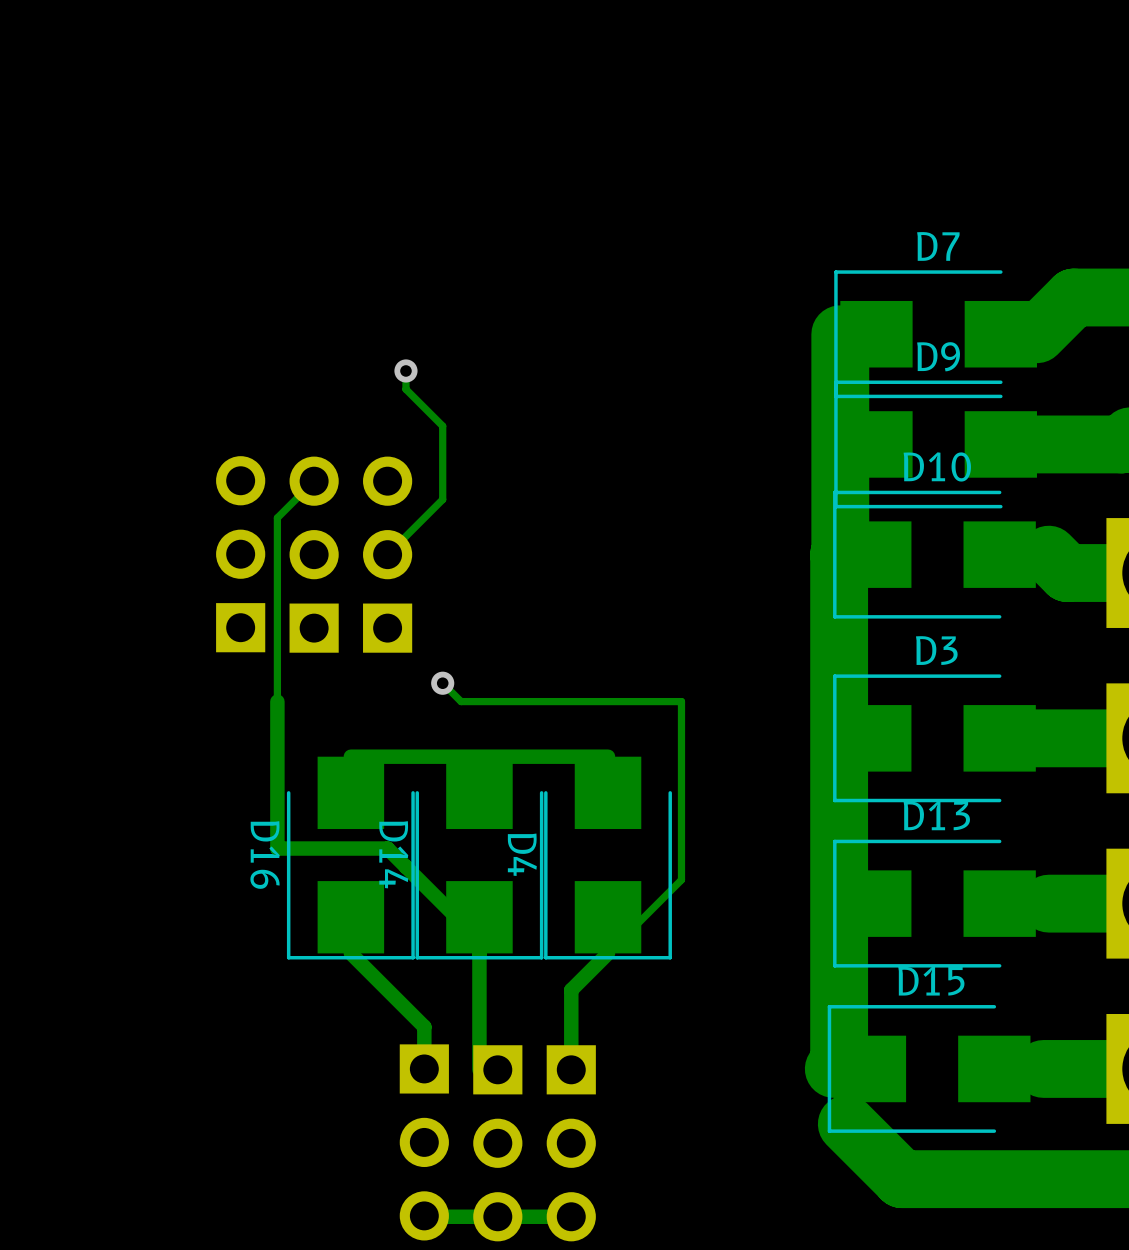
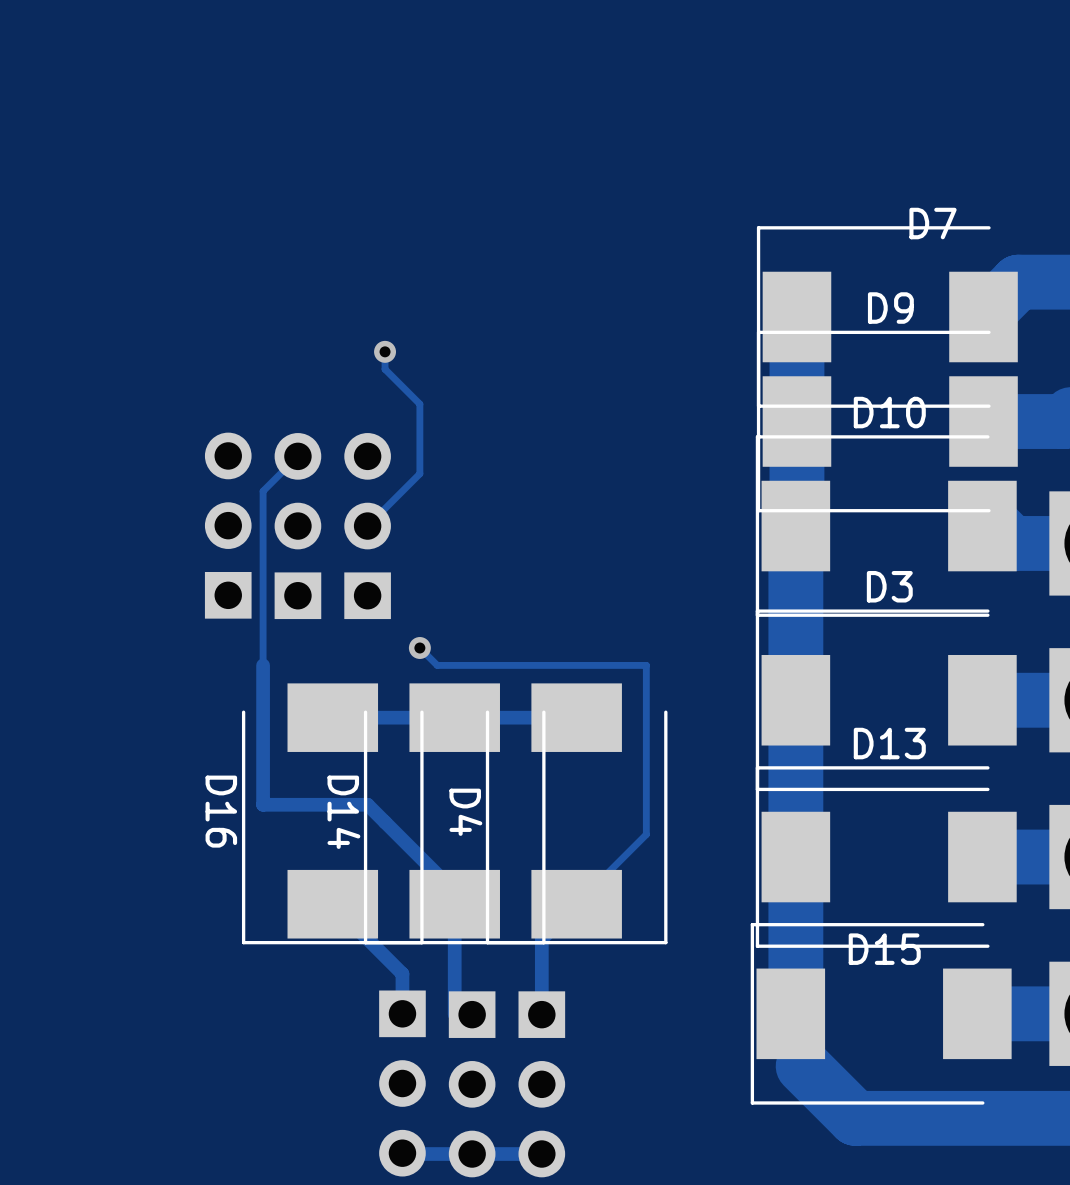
D7 footprint: [834, 270, 1037, 399] -> [756, 226, 1018, 408]
D9 footprint: [834, 380, 1037, 509] -> [756, 330, 1018, 513]
D10 footprint: [833, 490, 1036, 619] -> [755, 435, 1017, 617]
D3 footprint: [833, 674, 1036, 803] -> [755, 609, 1017, 792]
D16 footprint: [286, 756, 415, 960] -> [241, 683, 424, 945]
D14 footprint: [415, 756, 544, 960] -> [363, 683, 546, 945]
D4 footprint: [544, 756, 672, 960] -> [485, 683, 668, 945]
D13 footprint: [833, 839, 1036, 968] -> [755, 766, 1017, 948]
D15 footprint: [827, 1005, 1031, 1133] -> [750, 923, 1012, 1105]

